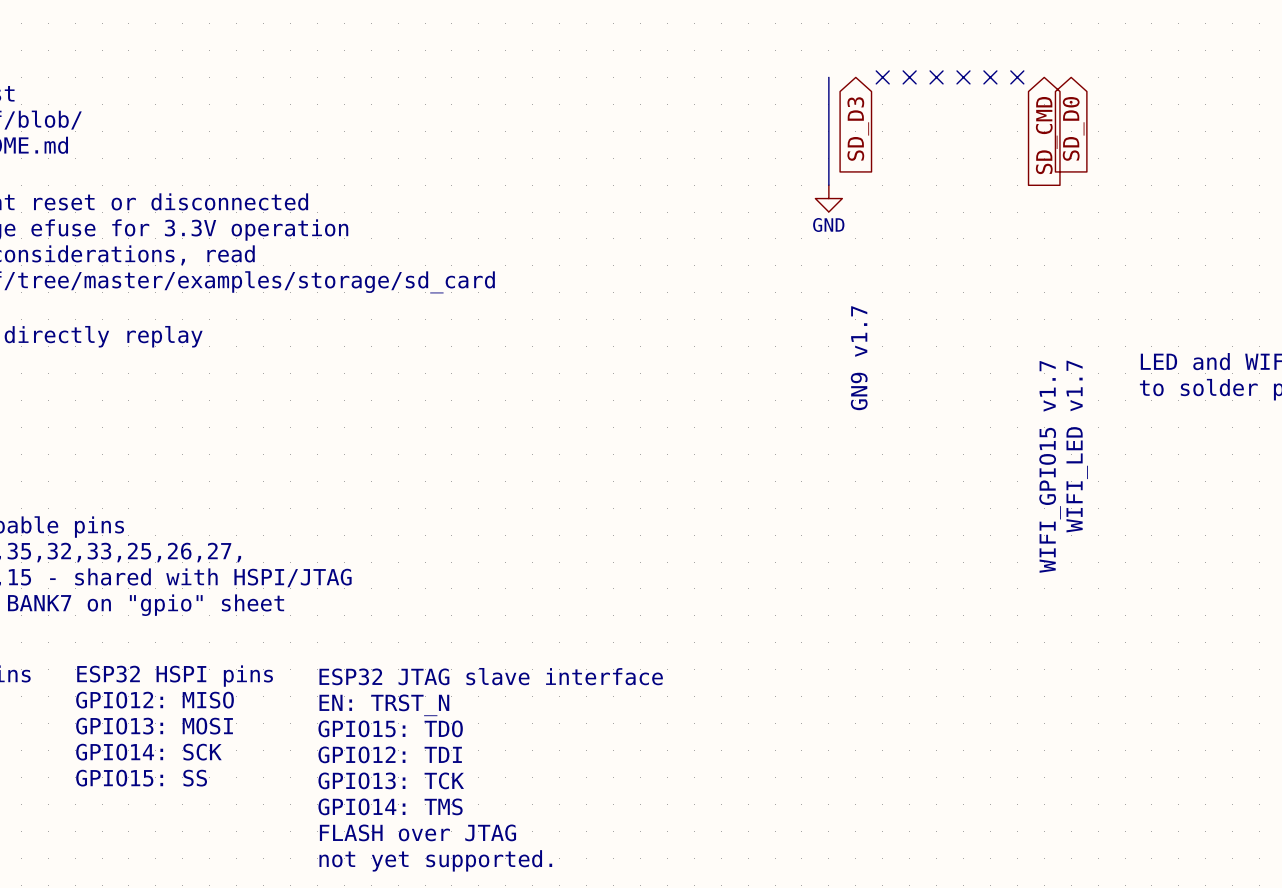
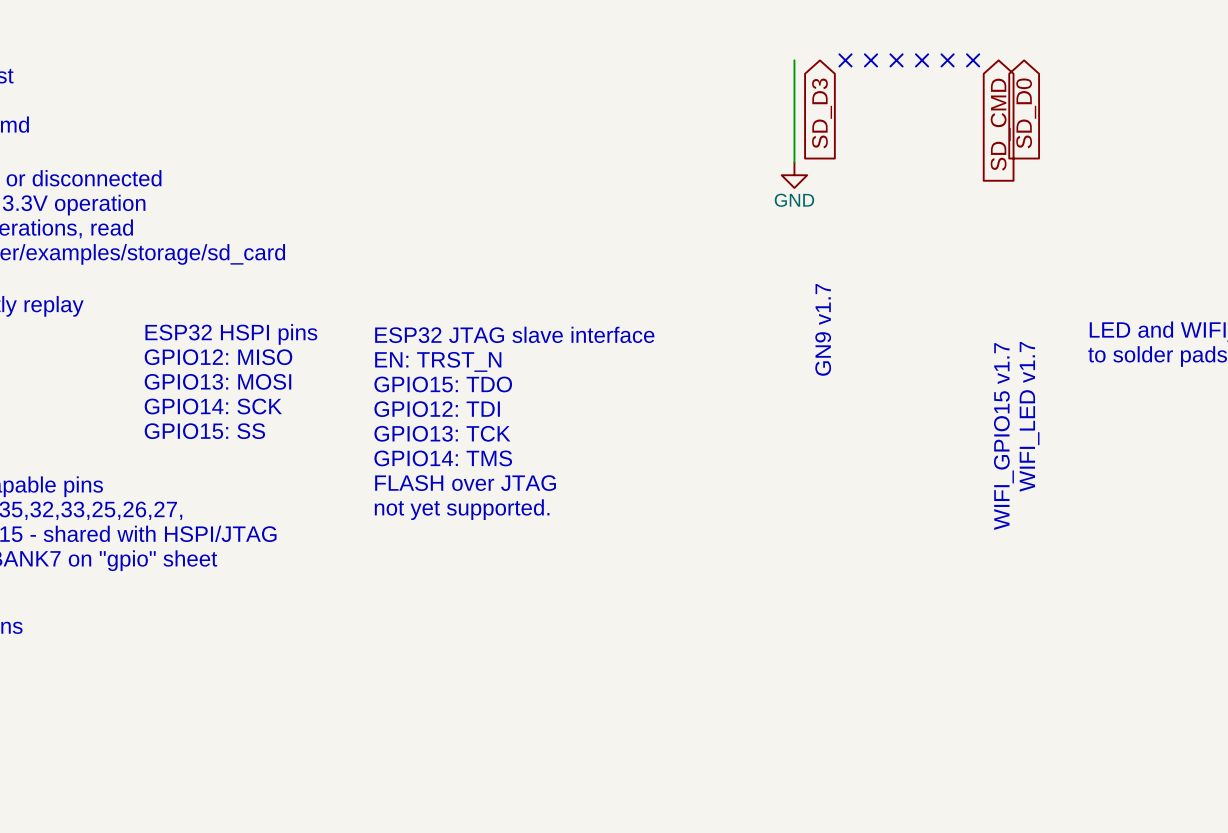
text: none -> ESP32 HSPI pins (231, 334)
text: none -> ESP32 JTAG slave interface (514, 334)
text: none -> GPIO12: MISO (218, 357)
text: none -> EN: TRST_N (438, 361)
text: none -> GPIO13: MOSI (217, 381)
text: none -> GPIO15: TDO (443, 384)
text: none -> GPIO14: SCK (213, 406)
text: none -> GPIO12: TDI (437, 409)
text: none -> GPIO15: SS (204, 431)
text: none -> GPIO13: TCK (442, 433)
text: none -> GPIO14: TMS (443, 458)
text: none -> FLASH over JTAG (465, 483)
text: none -> not yet supported. (462, 509)
text: ESP32 HSPI pins (175, 676) -> none
text: ESP32 JTAG slave interface (491, 676) -> none
text: GPIO12: MISO (155, 700) -> none
text: EN: TRST_N (384, 705) -> none
text: GPIO13: MOSI (154, 726) -> none
text: GPIO15: TDO (390, 728) -> none
text: GPIO14: SCK (148, 752) -> none
text: GPIO12: TDI (390, 754) -> none
text: GPIO15: SS (141, 778) -> none
text: GPIO13: TCK (391, 780) -> none
text: GPIO14: TMS (390, 806) -> none
text: FLASH over JTAG (417, 832) -> none
text: not yet supported. (435, 860) -> none

